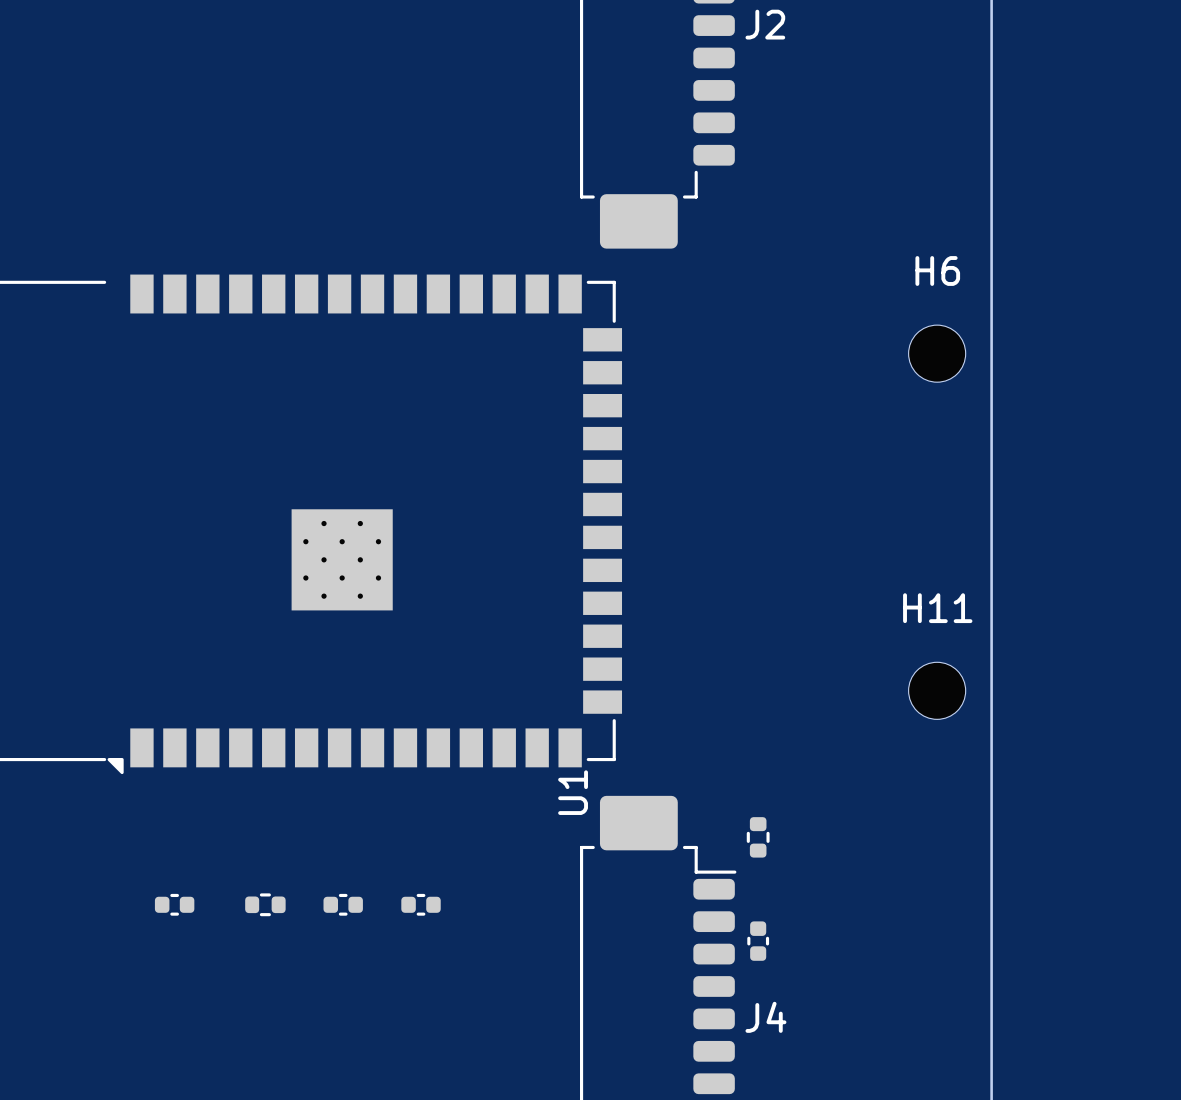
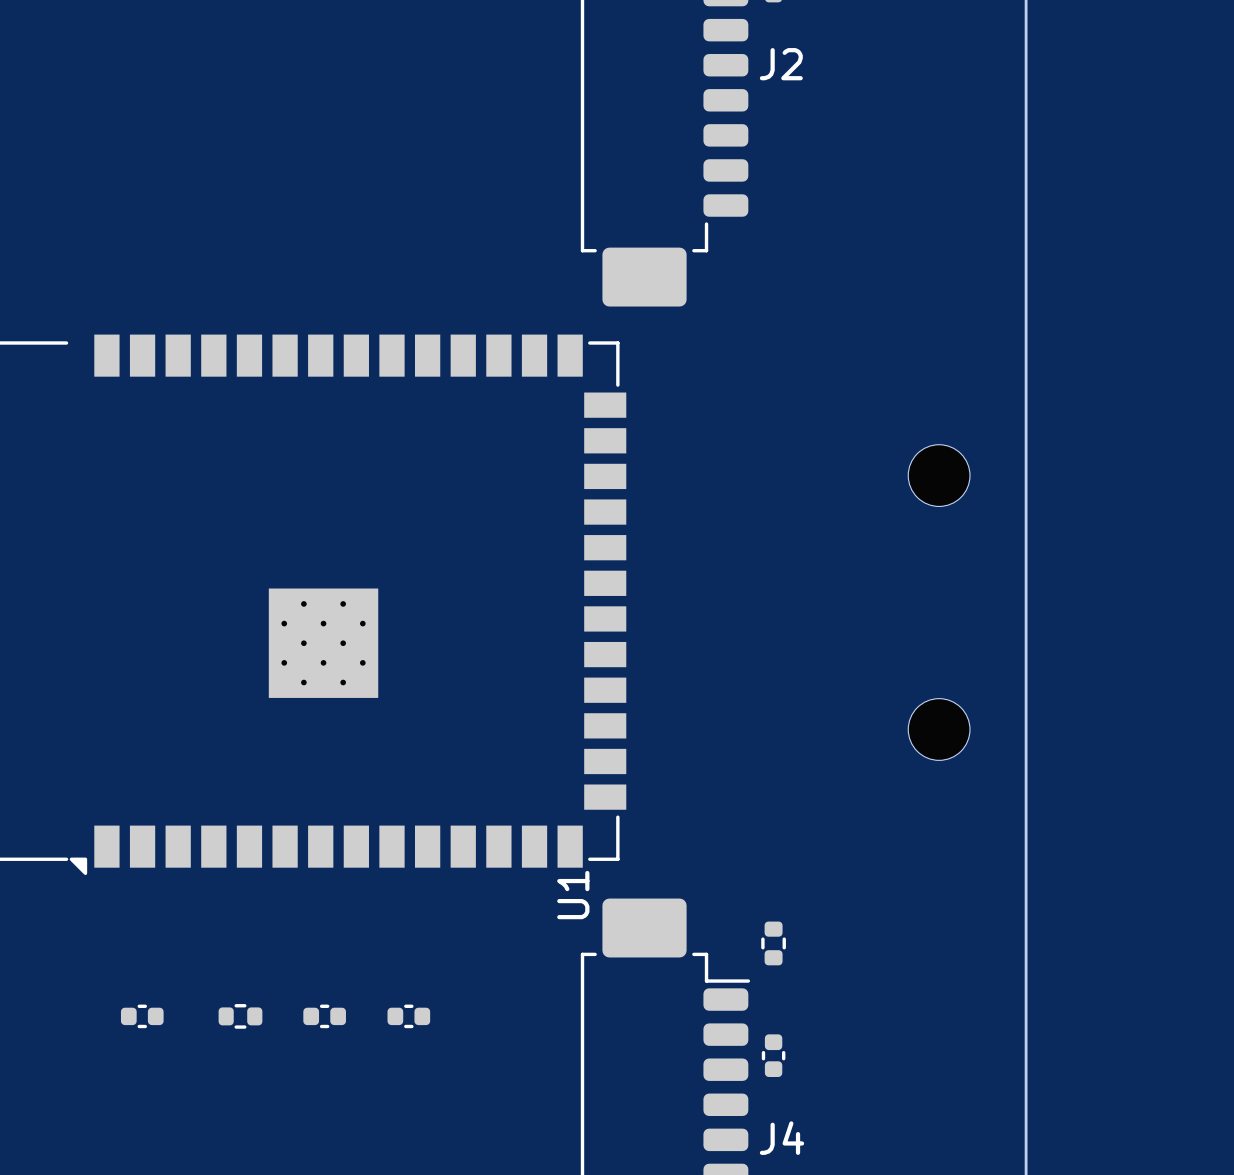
H6: (937, 353) -> none
part: none -> (939, 475)
part: none -> (939, 729)
H11: (937, 690) -> none

